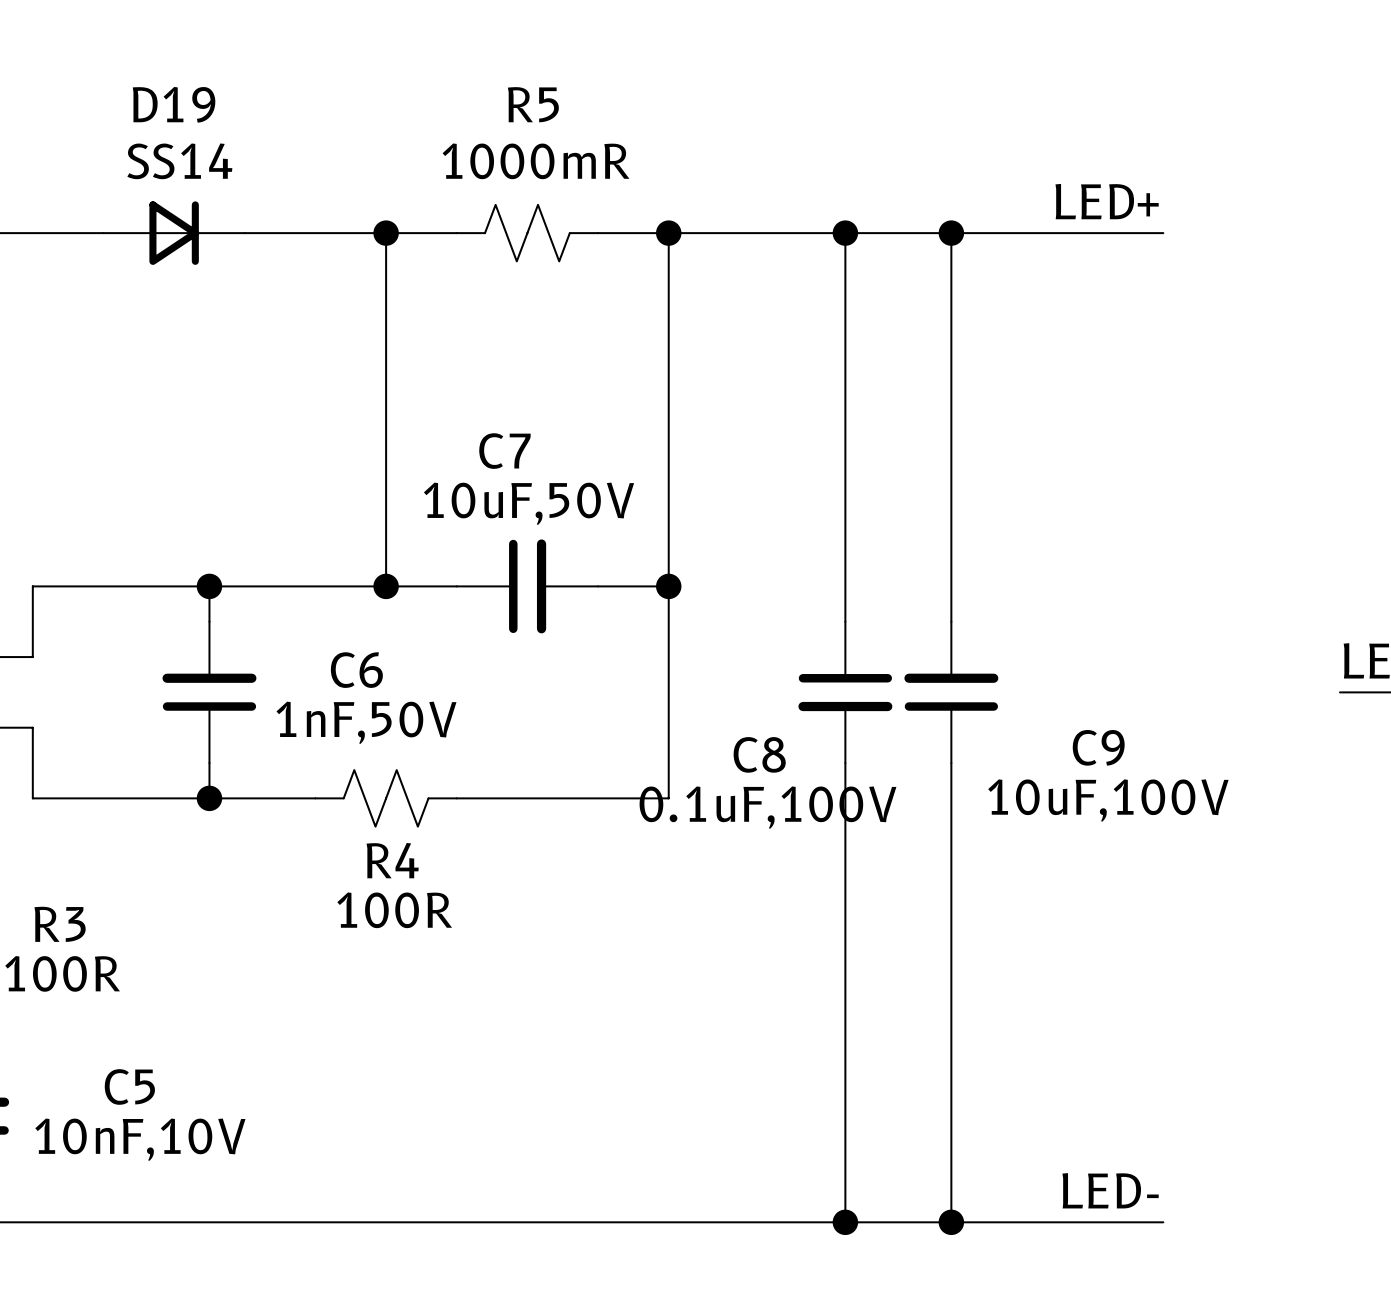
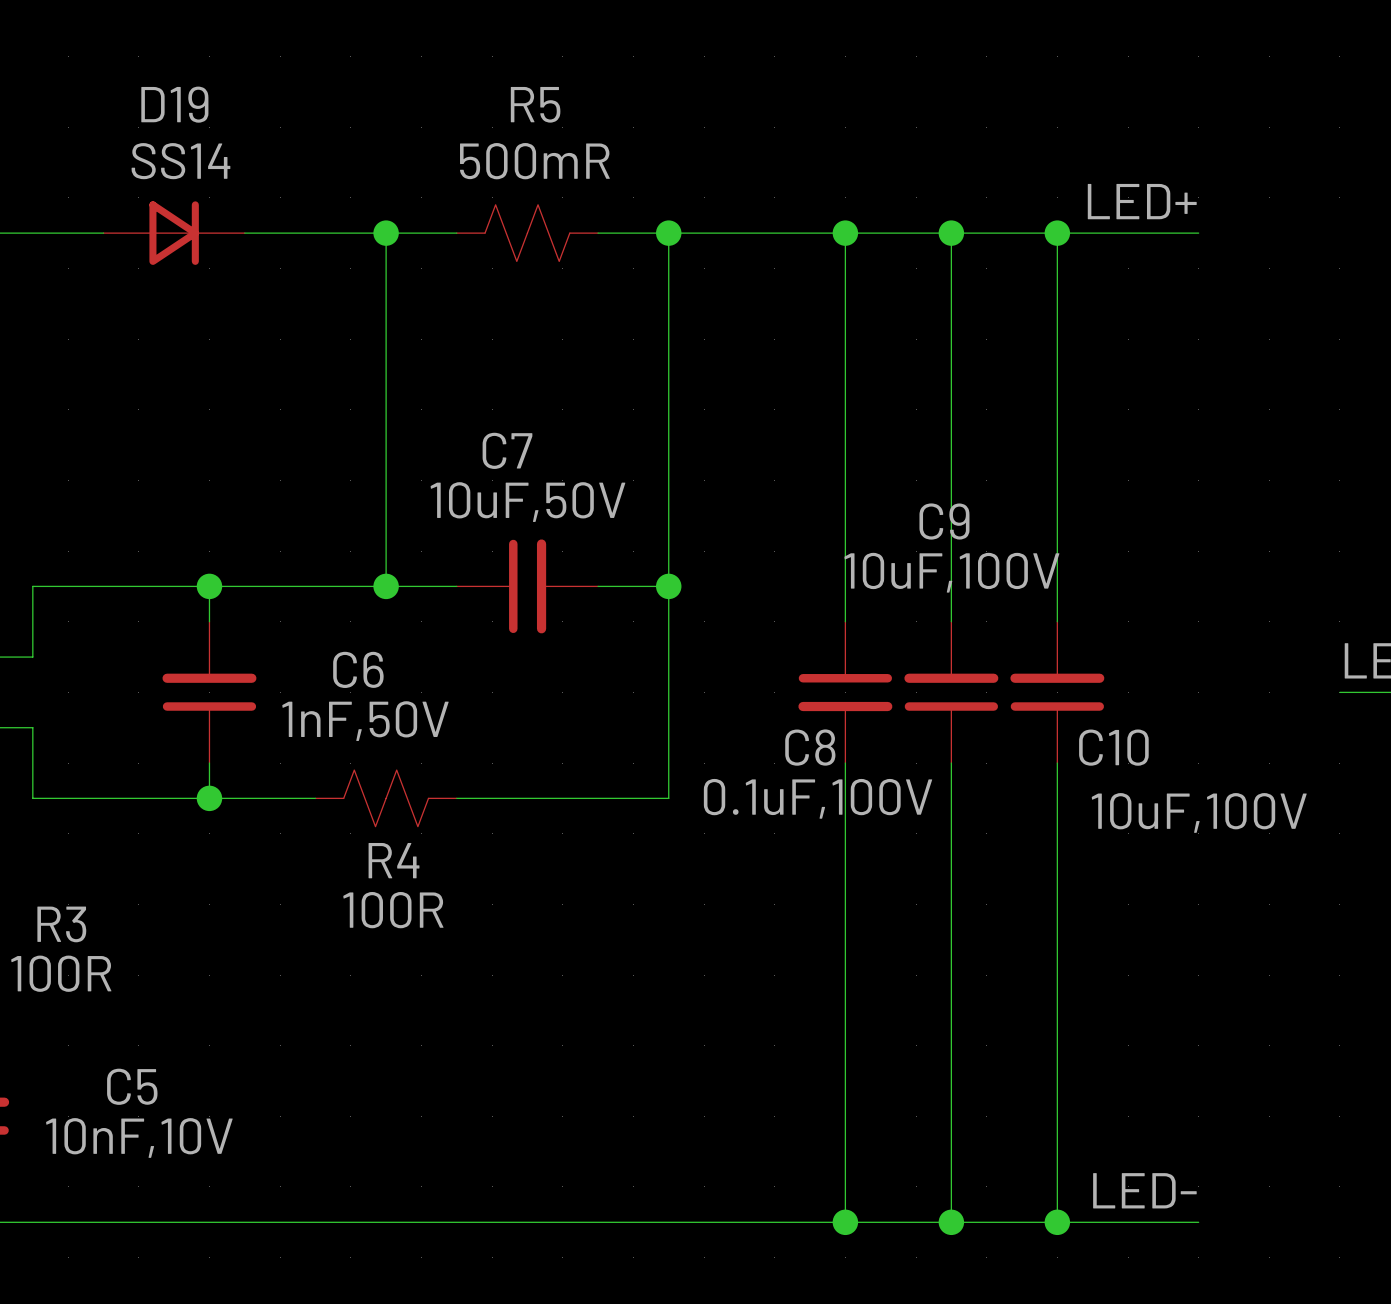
R5 value: 1000mR (536, 161) -> 500mR (534, 161)
label position: LED+ (1107, 201) -> LED+ (1142, 201)
wire: none -> (1057, 233) (1057, 621)
junction: none -> (1057, 233)
wire: none -> (1163, 233) (1198, 233)
C10: none -> 10uF,100V (1057, 692)
C9 name position: C9 (1098, 747) -> C9 (944, 521)
C8 name position: C8 (759, 754) -> C8 (810, 747)
wire: none -> (1057, 763) (1057, 1222)
C9 value position: 10uF,100V (1108, 800) -> 10uF,100V (951, 572)
C8 value position: 0.1uF,100V (768, 807) -> 0.1uF,100V (818, 798)
label position: LED- (1110, 1190) -> LED- (1144, 1190)
junction: none -> (1057, 1222)
wire: none -> (1163, 1222) (1198, 1222)

